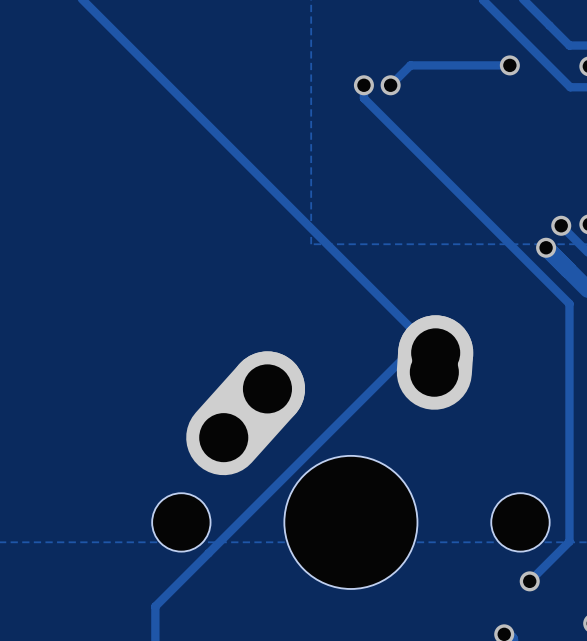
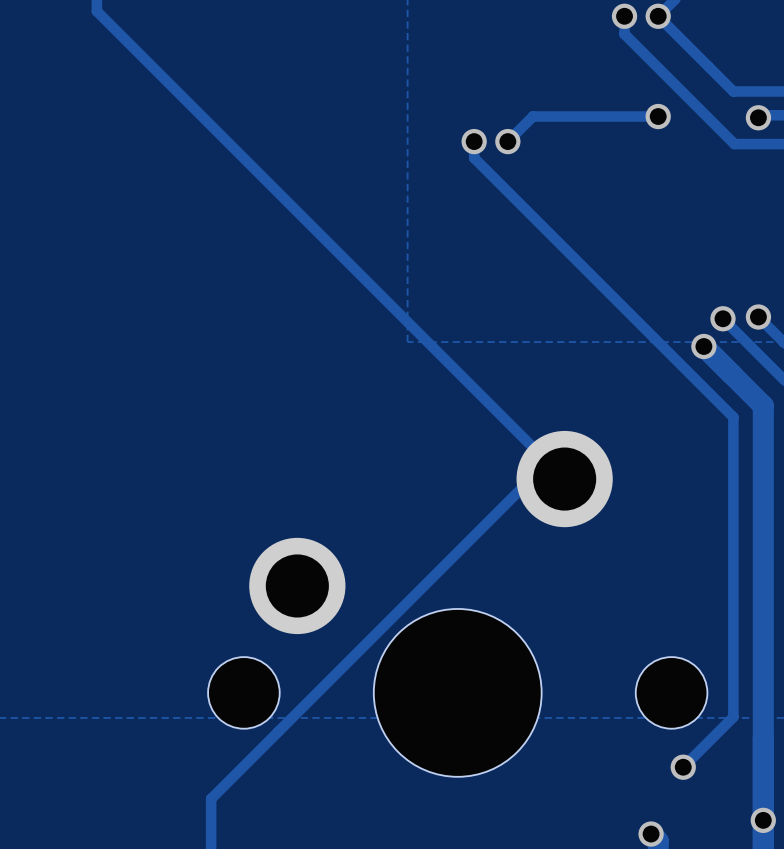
part footprint: [152, 315, 550, 589] -> [208, 430, 708, 777]

